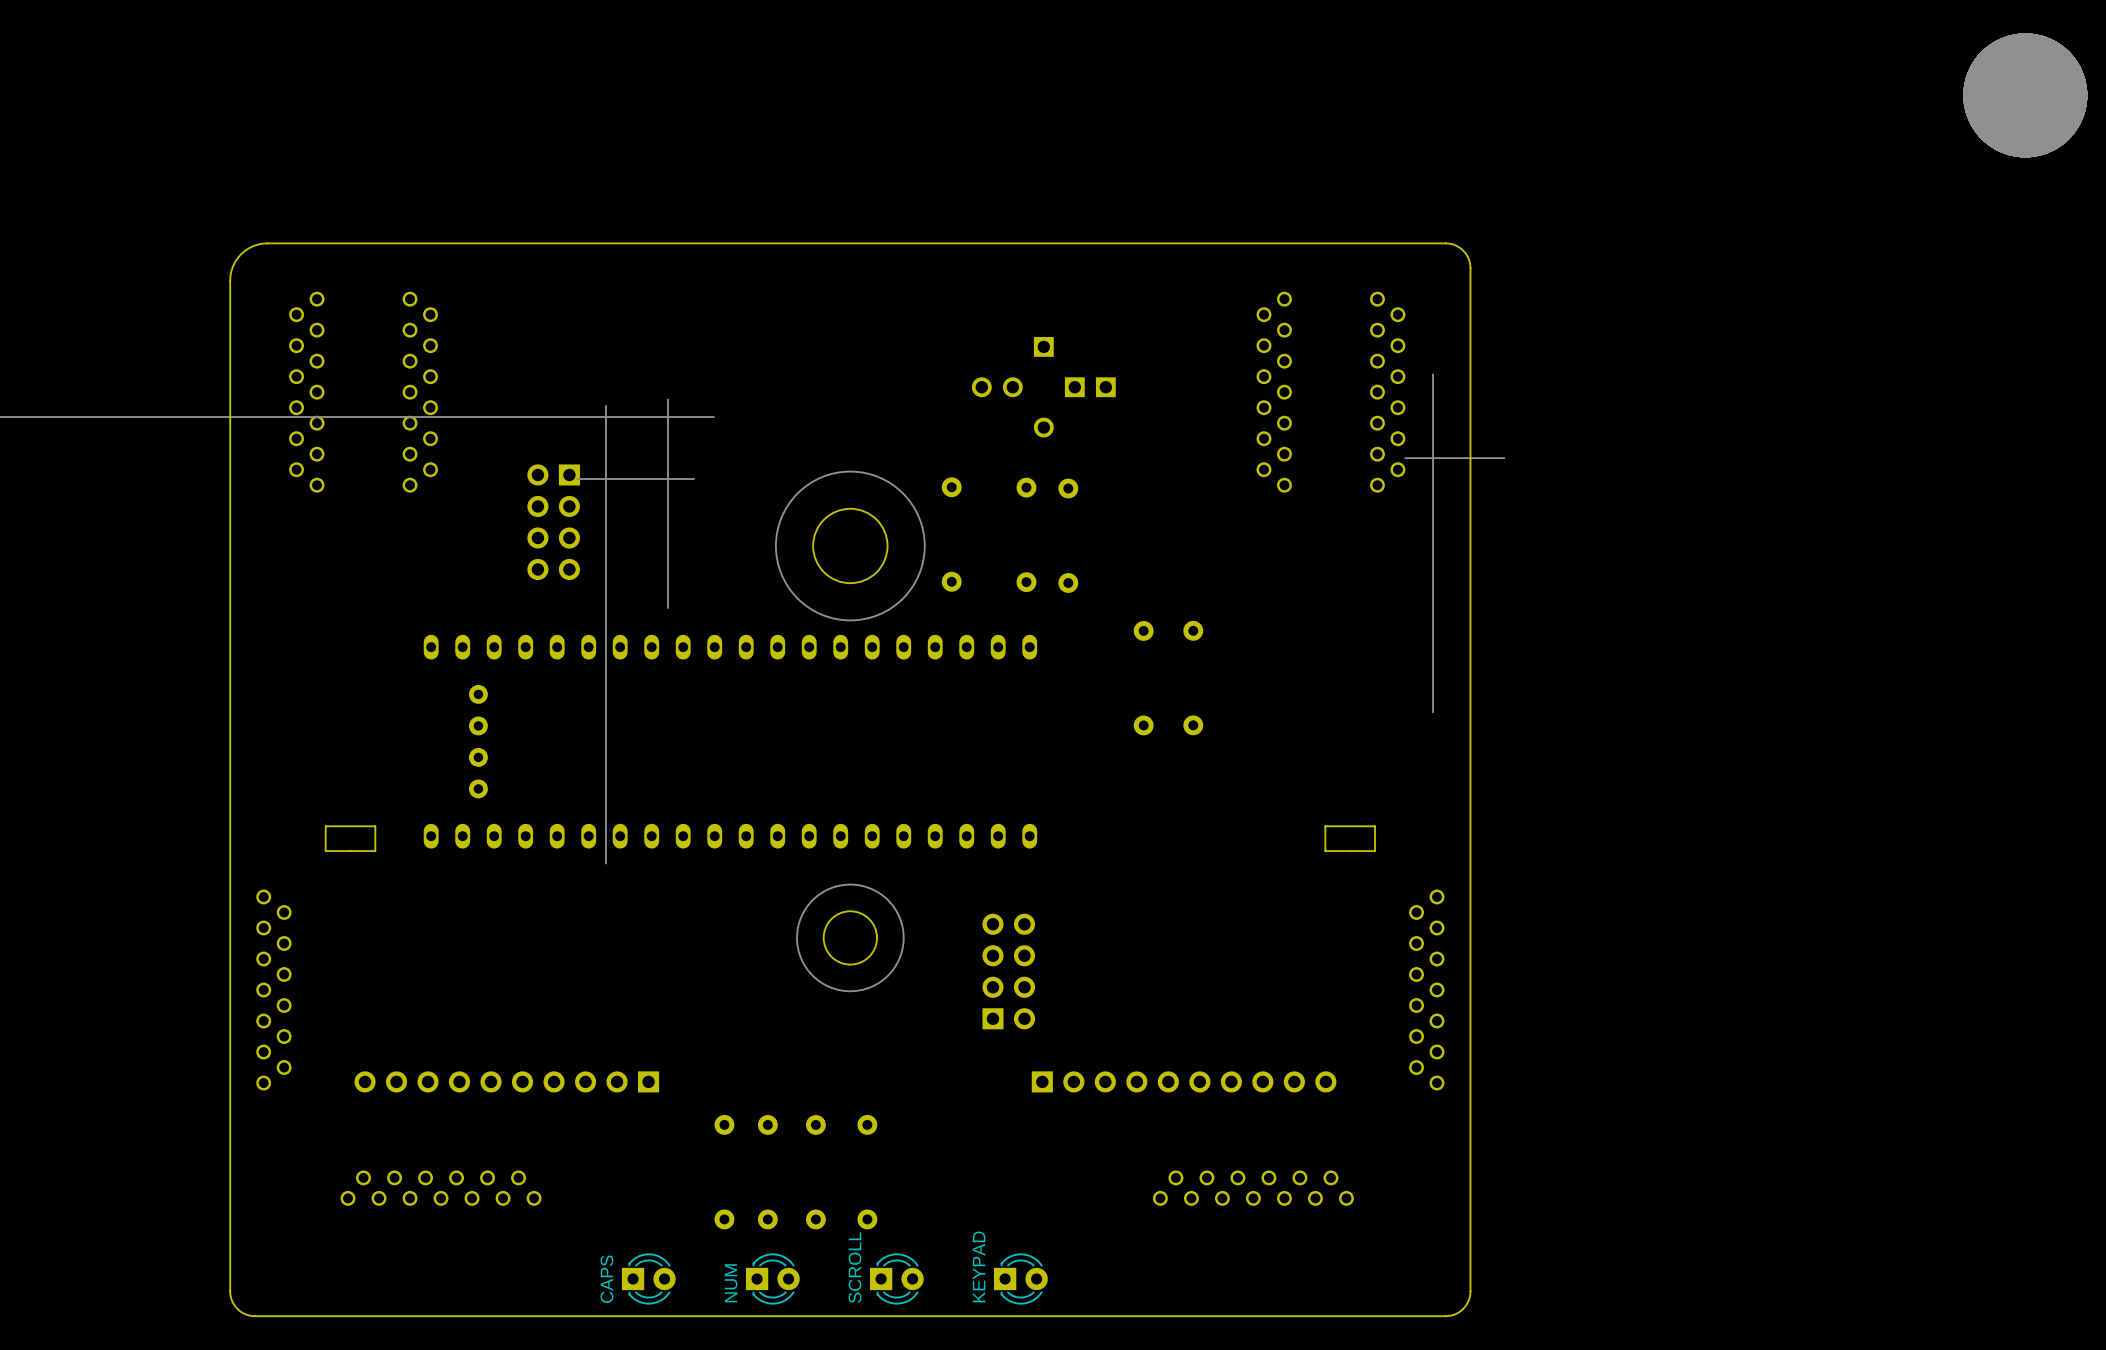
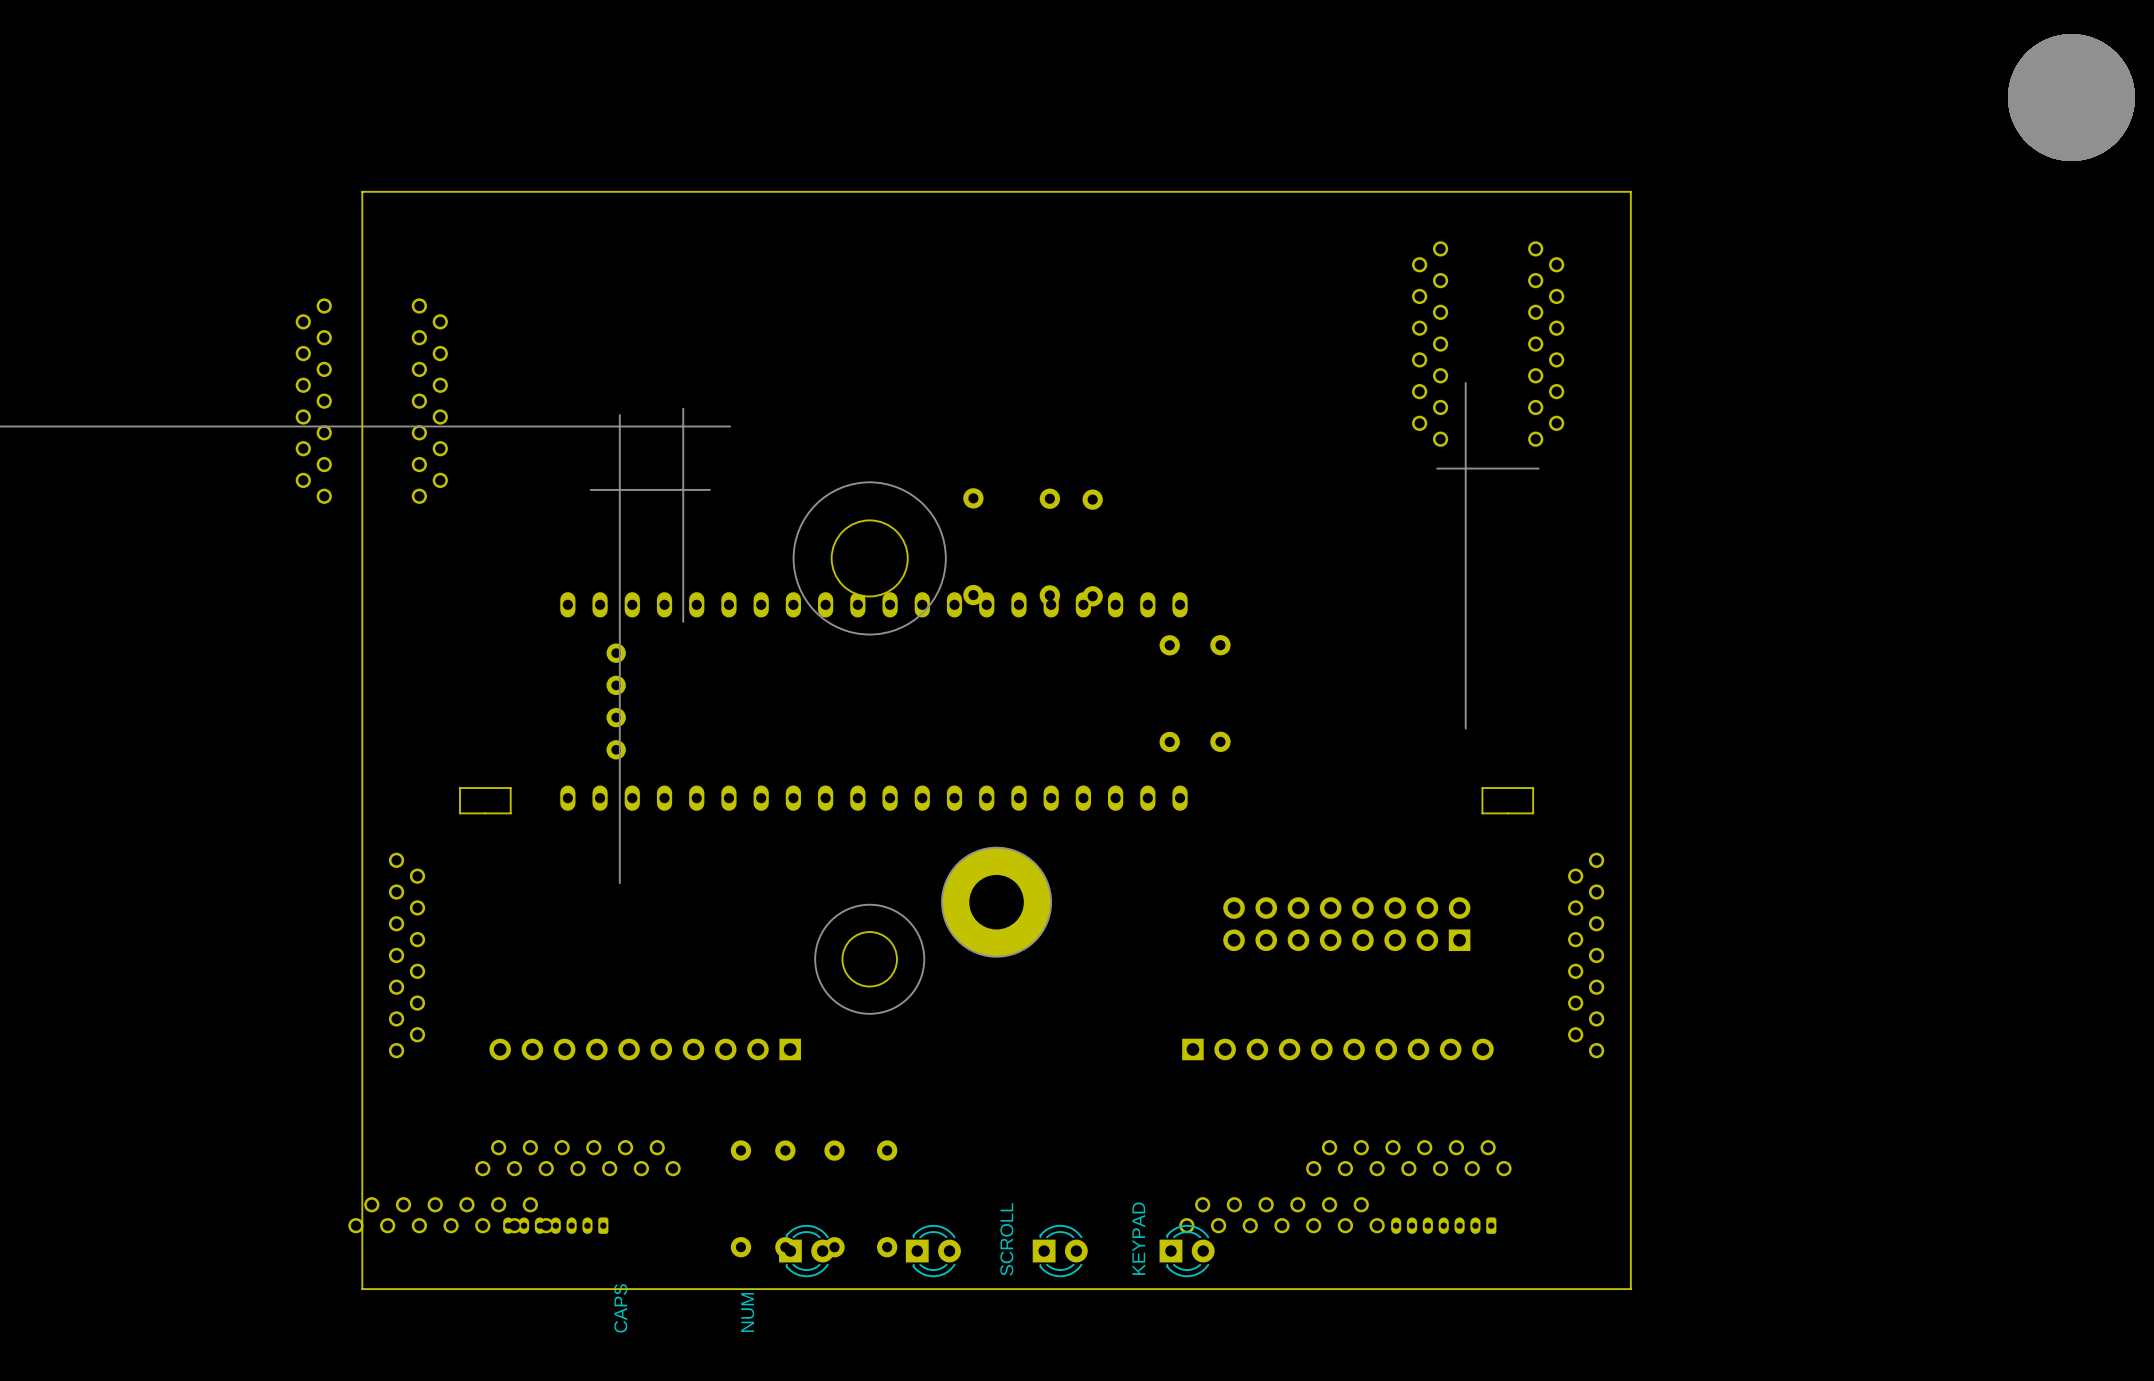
board edge: (267, 243) (1445, 243) (1461, 248) (1468, 257) (1470, 268) (1470, 1291) (1465, 1306) (1456, 1313) (1445, 1316) (255, 1316) (239, 1310) (232, 1302) (230, 1291) (230, 280) (233, 266) (241, 254) (253, 246) (267, 243) -> (362, 191) (362, 1289) (1630, 1289) (1630, 191) (362, 191)
part: none -> (1546, 344)
part: (1043, 387) -> none
part: (1274, 392) -> none
part rotation: 0° (1387, 392) -> 180° (1430, 344)
part: (553, 522) -> none
part position: (730, 741) -> (873, 701)
board edge: (325, 826) (375, 826) (375, 851) (325, 851) (325, 826) -> (459, 788) (510, 788) (510, 813) (459, 813) (459, 788)
board edge: (1325, 826) (1374, 826) (1374, 851) (1325, 851) (1325, 826) -> (1482, 788) (1533, 788) (1533, 813) (1482, 813) (1482, 788)
part: none -> (996, 902)
part: none -> (1346, 924)
part: none -> (1586, 955)
part: (1008, 971) -> none
part position: (273, 990) -> (407, 955)
part: (1426, 990) -> none
part position: (506, 1081) -> (645, 1049)
part position: (1184, 1081) -> (1337, 1049)
part: none -> (577, 1158)
part: none -> (1408, 1158)
part: none -> (555, 1225)
part: none -> (1443, 1225)
part: none -> (1187, 1251)
text position: KEYPAD (979, 1266) -> KEYPAD (1138, 1238)
text position: SCROLL (855, 1267) -> SCROLL (1006, 1239)
part: (648, 1278) -> none
part position: (772, 1278) -> (806, 1251)
part position: (896, 1278) -> (933, 1251)
part position: (1020, 1278) -> (1060, 1251)

